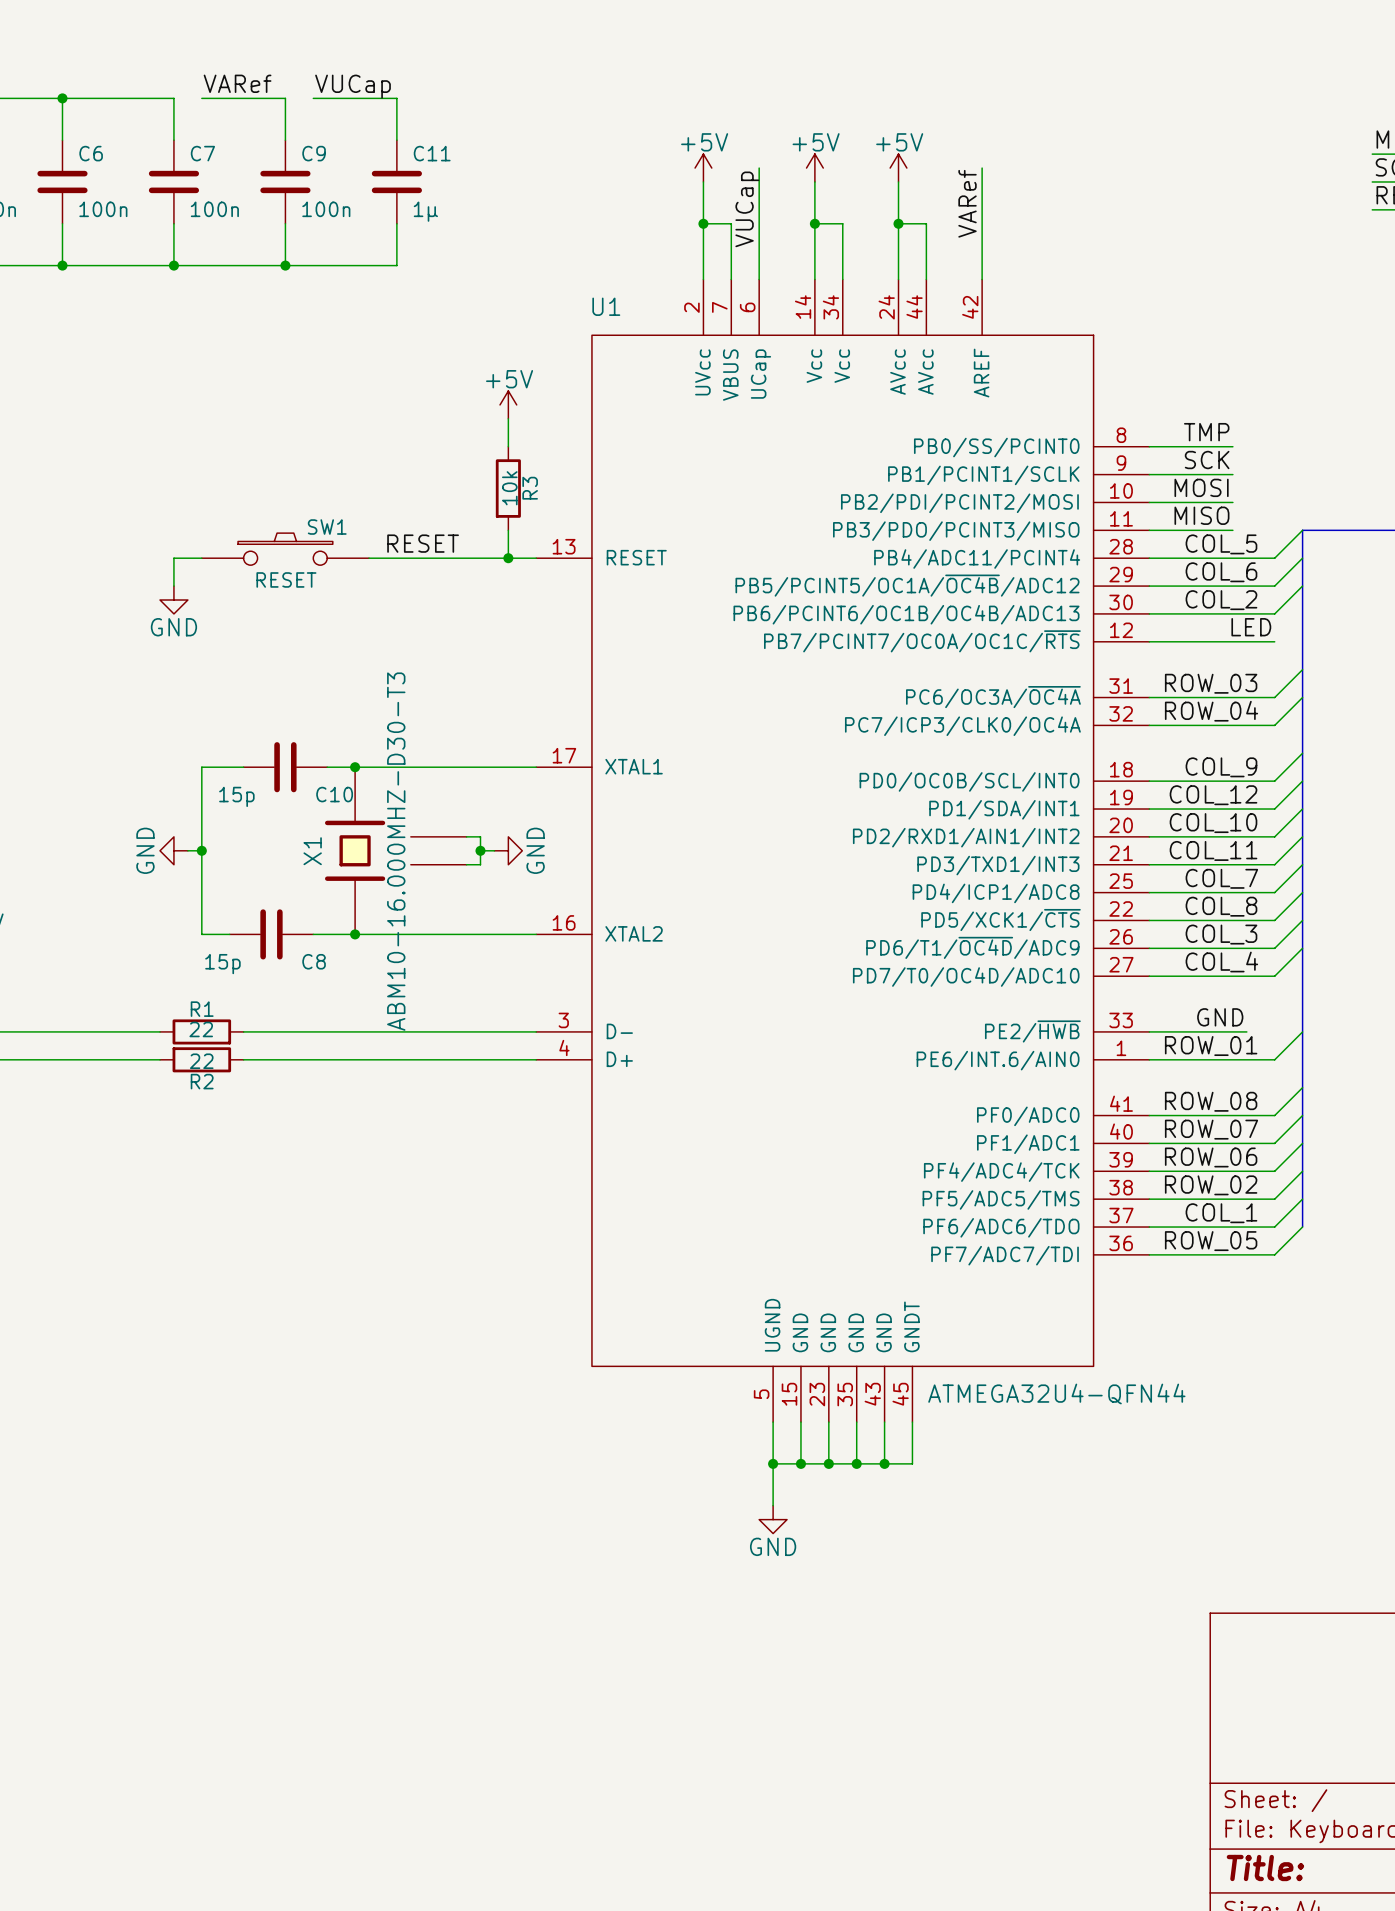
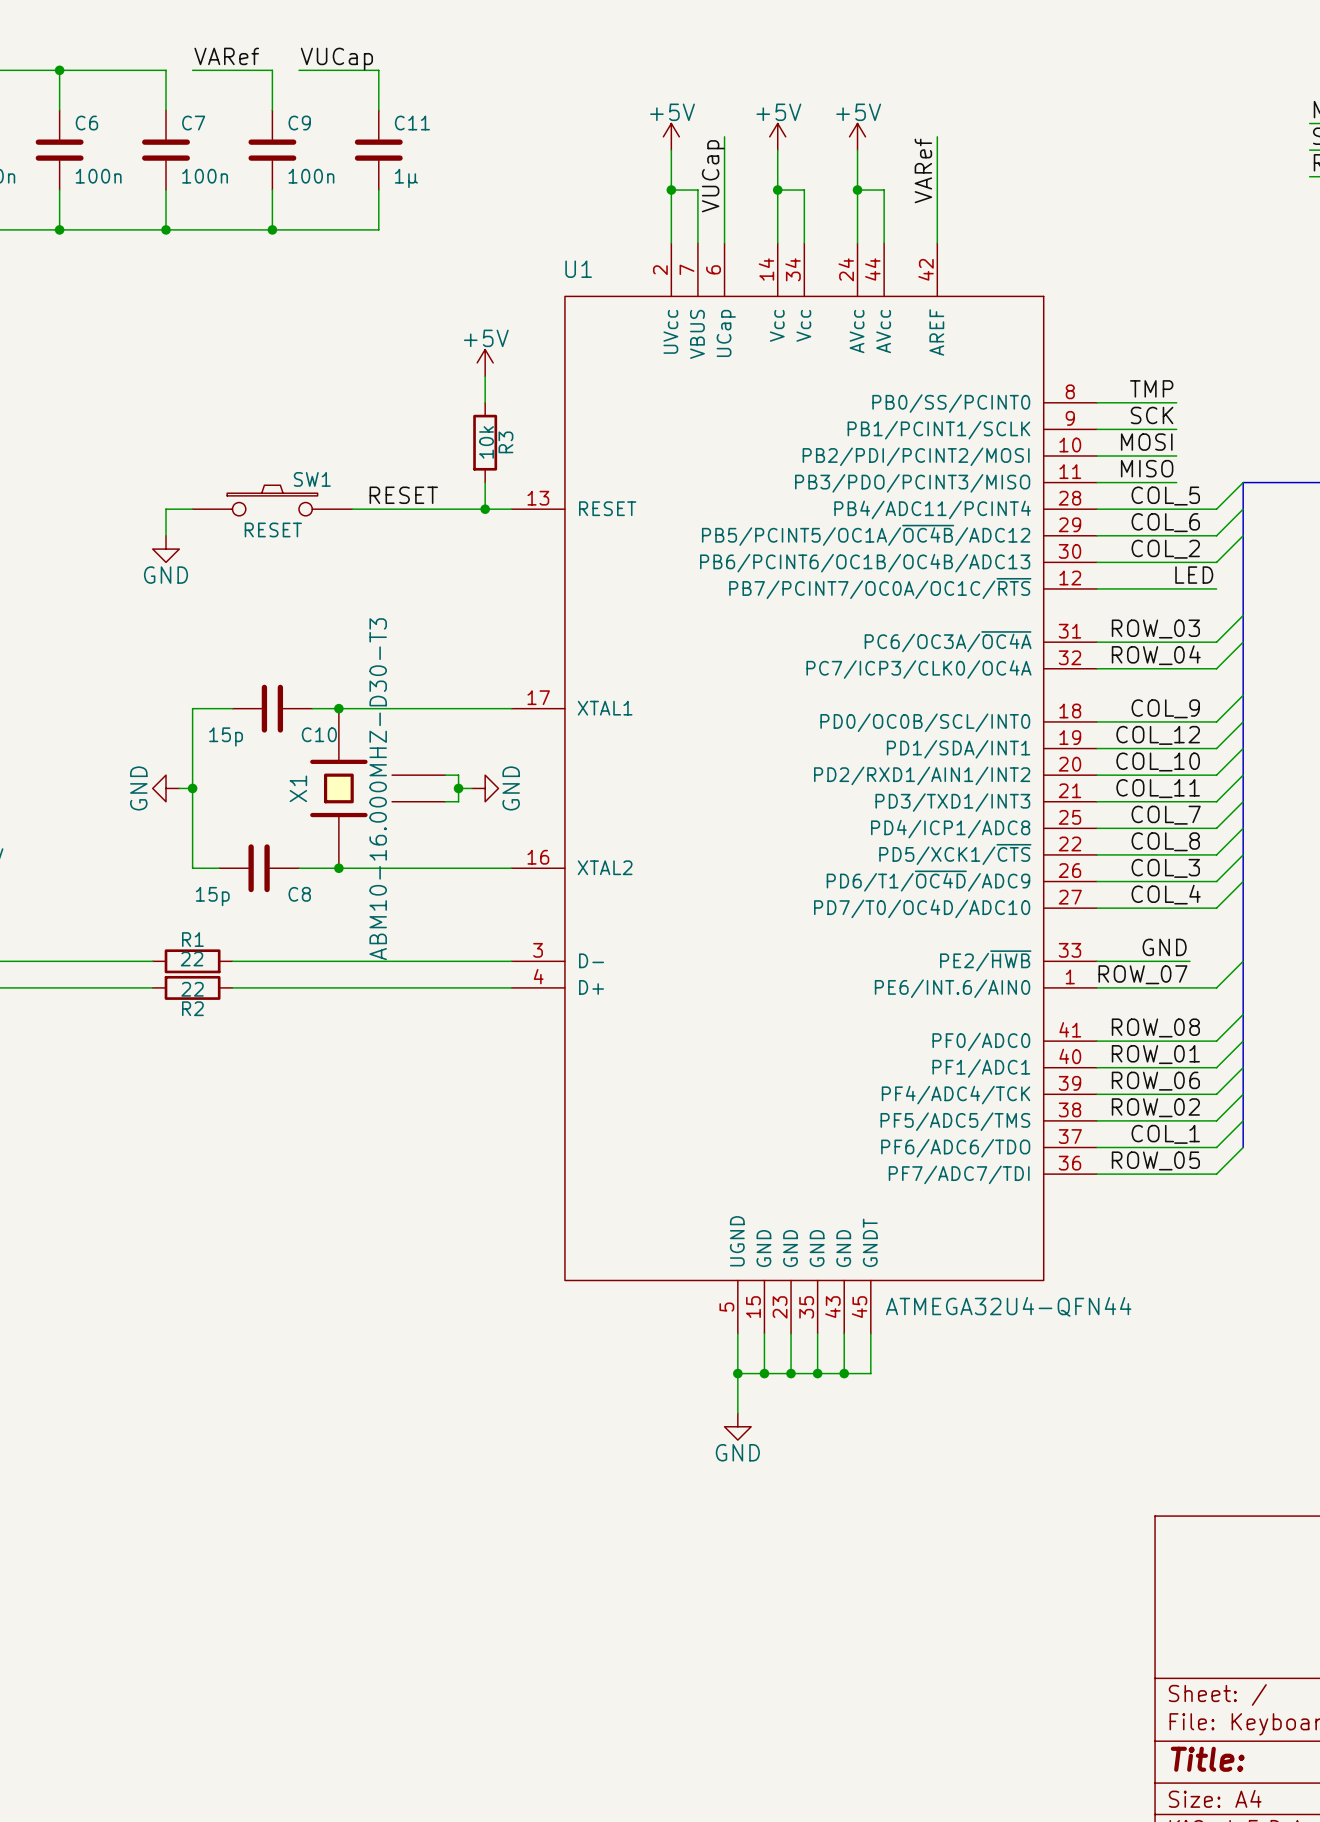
label: ROW_01 (1211, 1046) -> ROW_07 (1142, 974)
label: ROW_07 (1211, 1129) -> ROW_01 (1155, 1054)

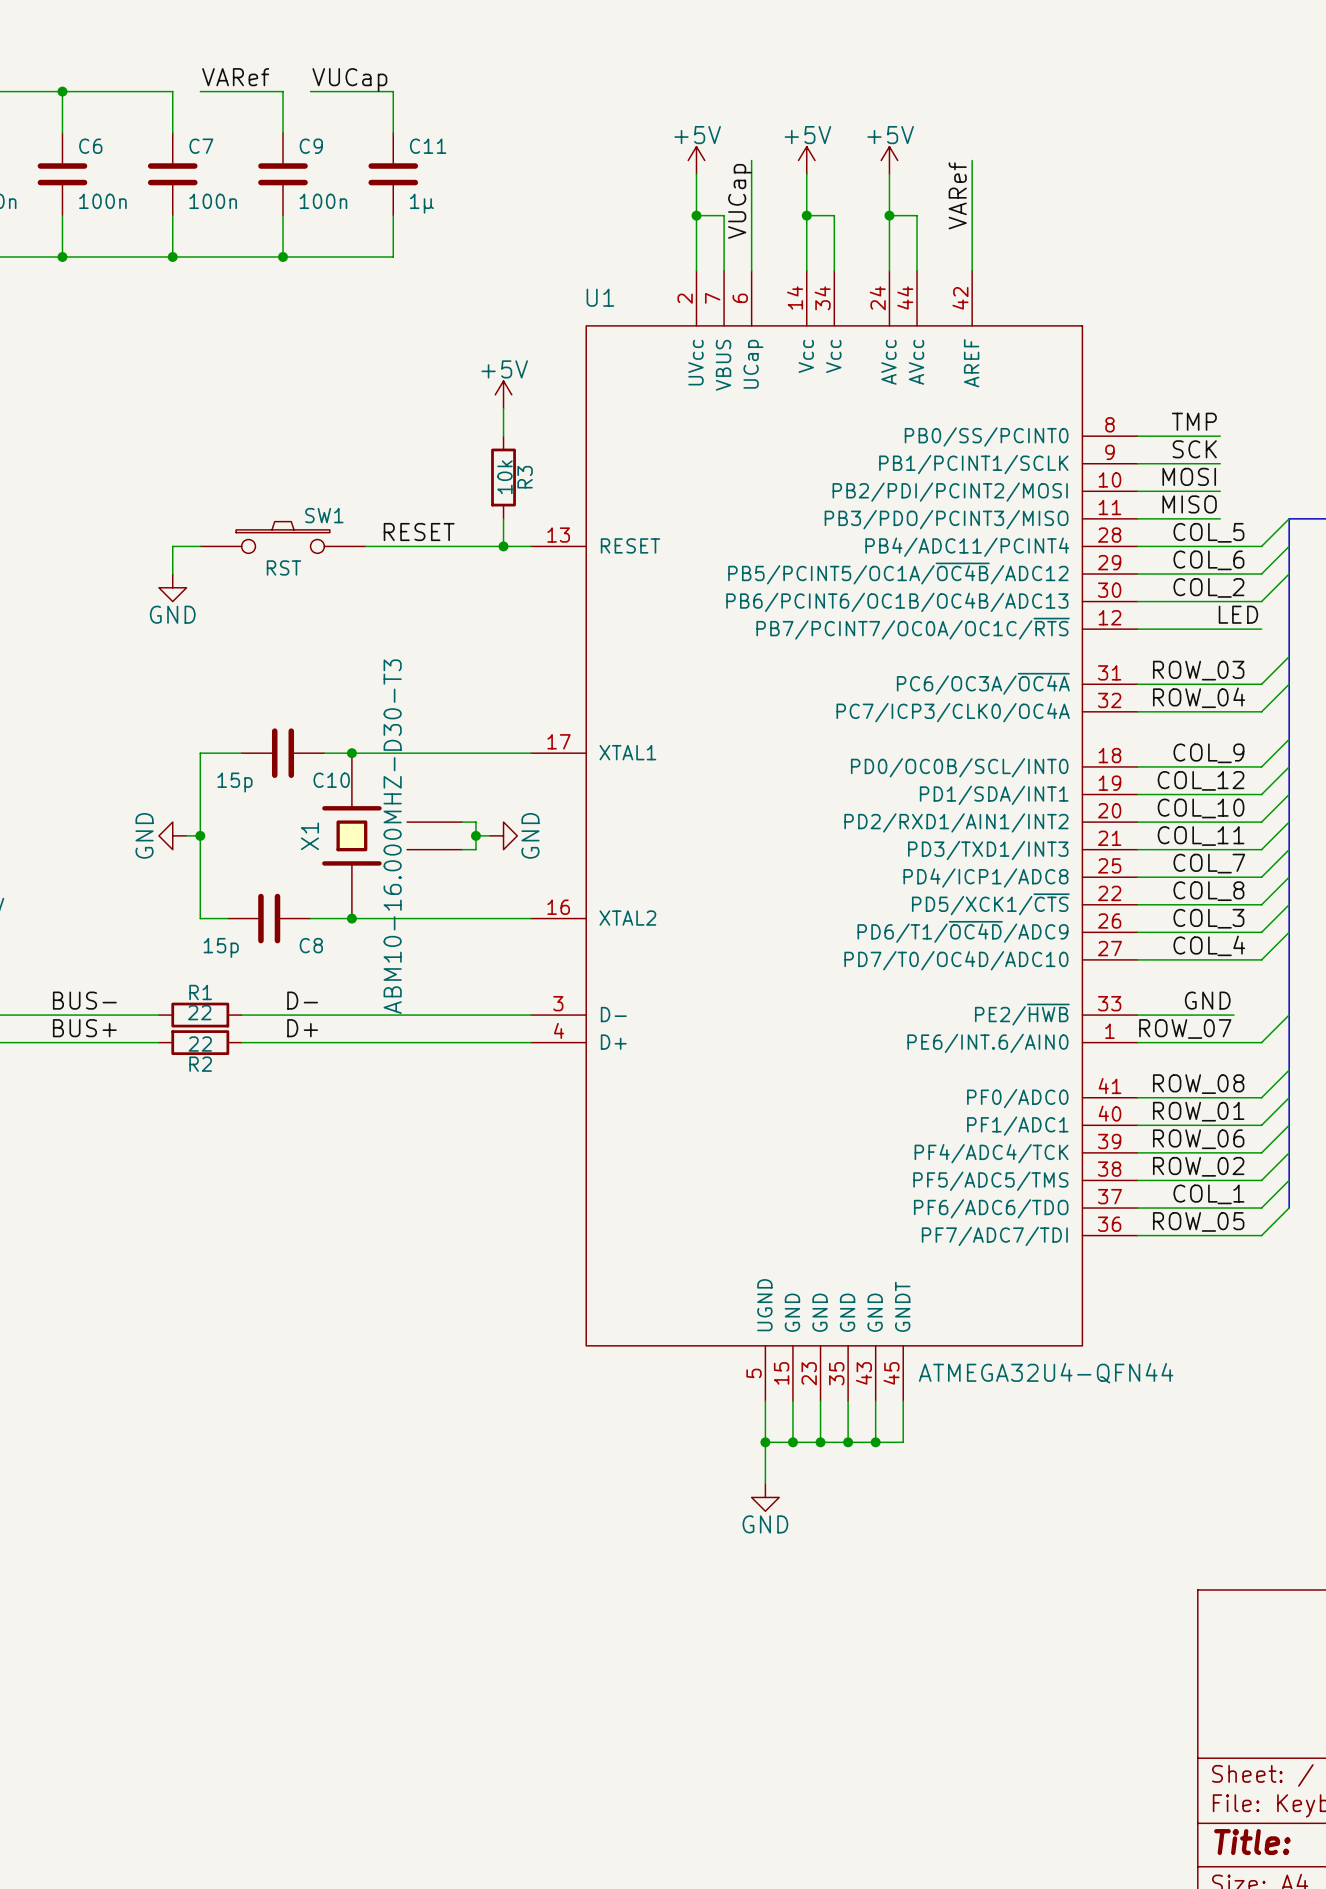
SW1 value: RESET (273, 529) -> RST (283, 567)
label: none -> BUS- (84, 1000)
label: none -> D- (302, 1000)
label: none -> BUS+ (84, 1028)
label: none -> D+ (302, 1028)

